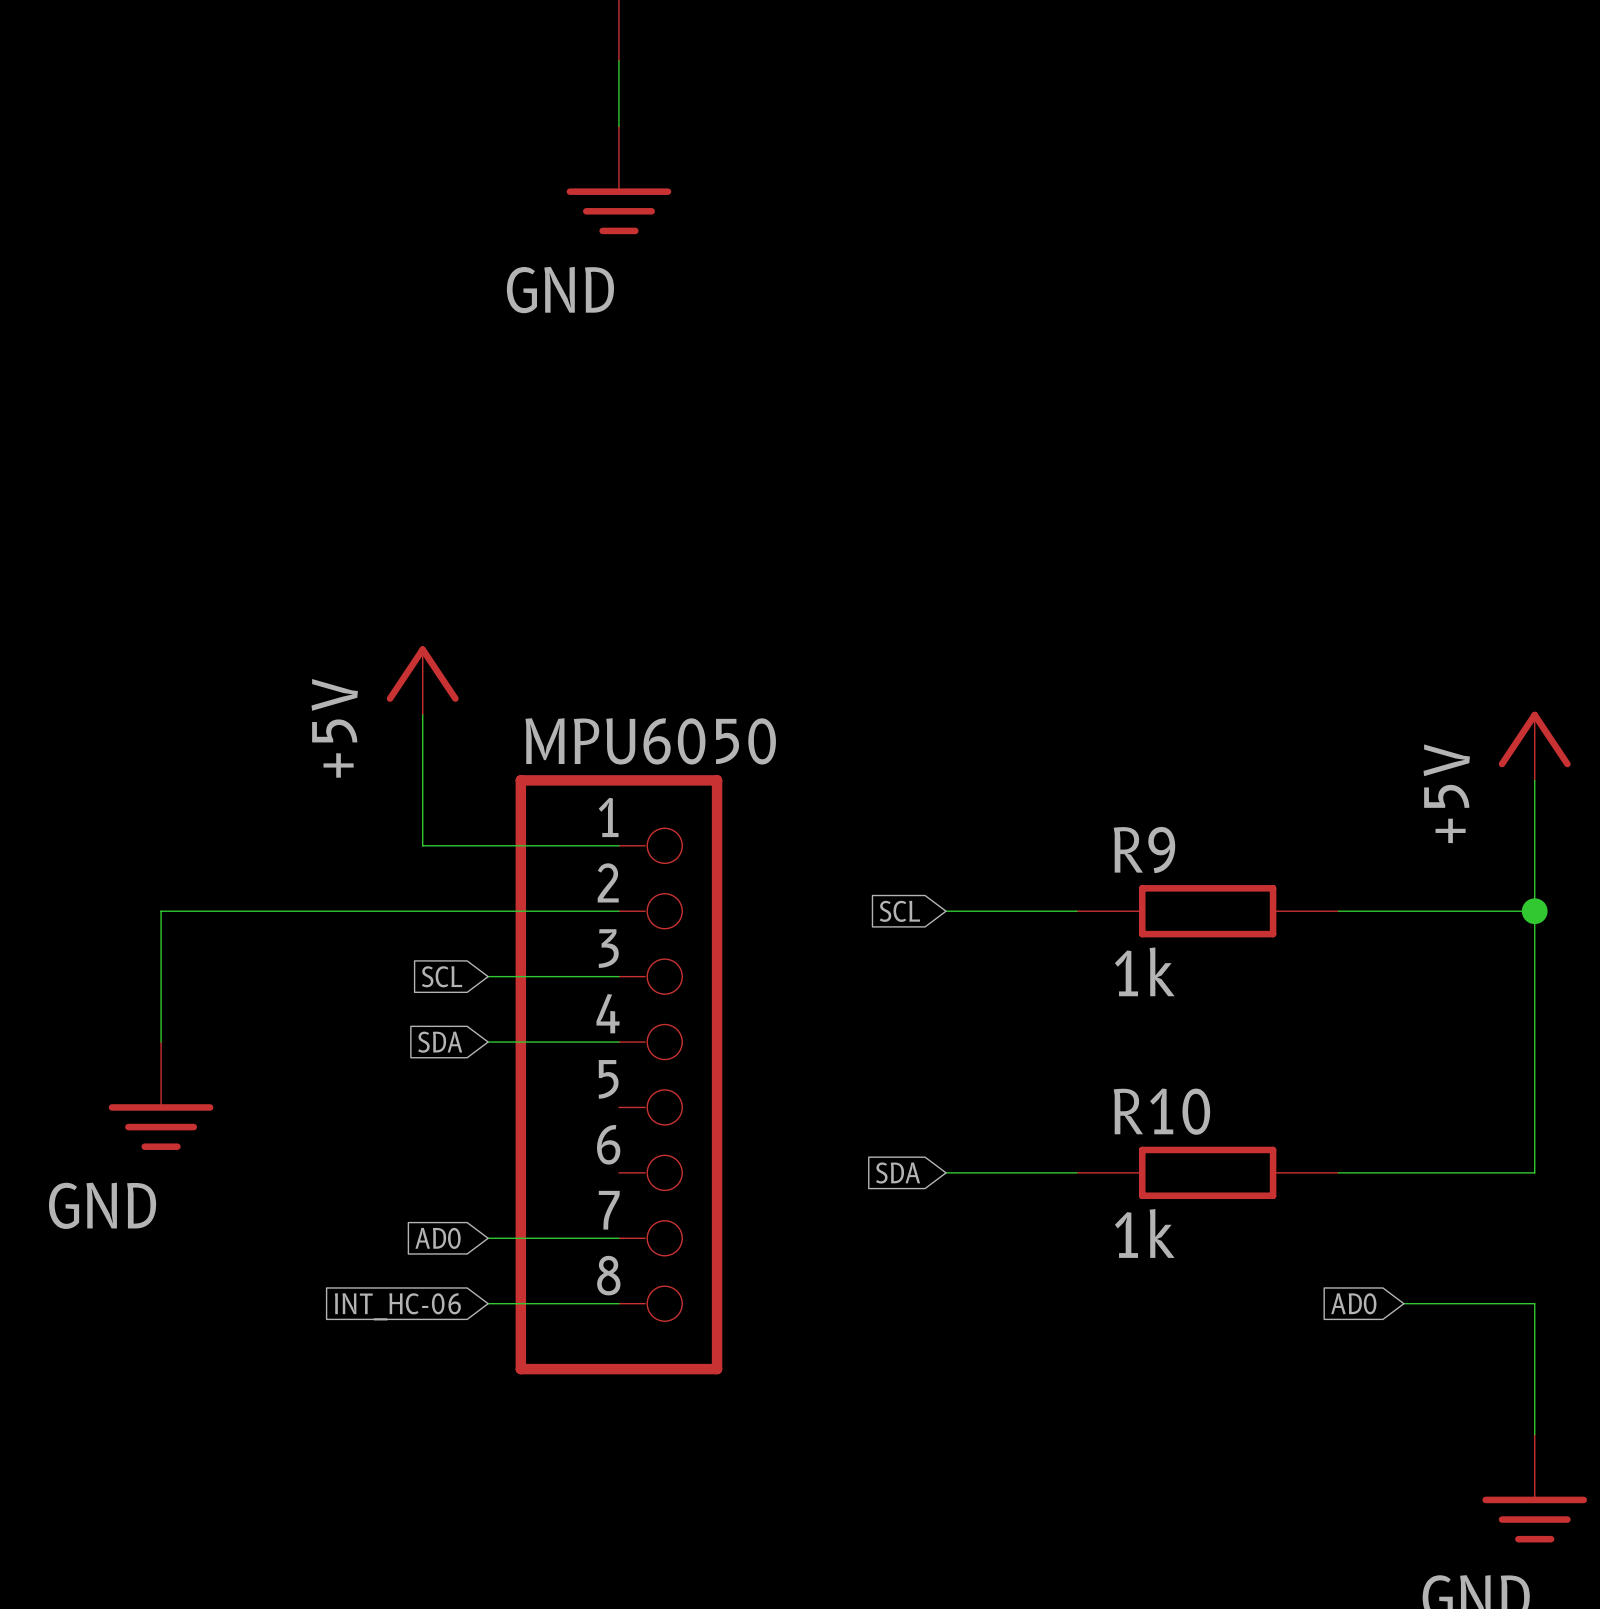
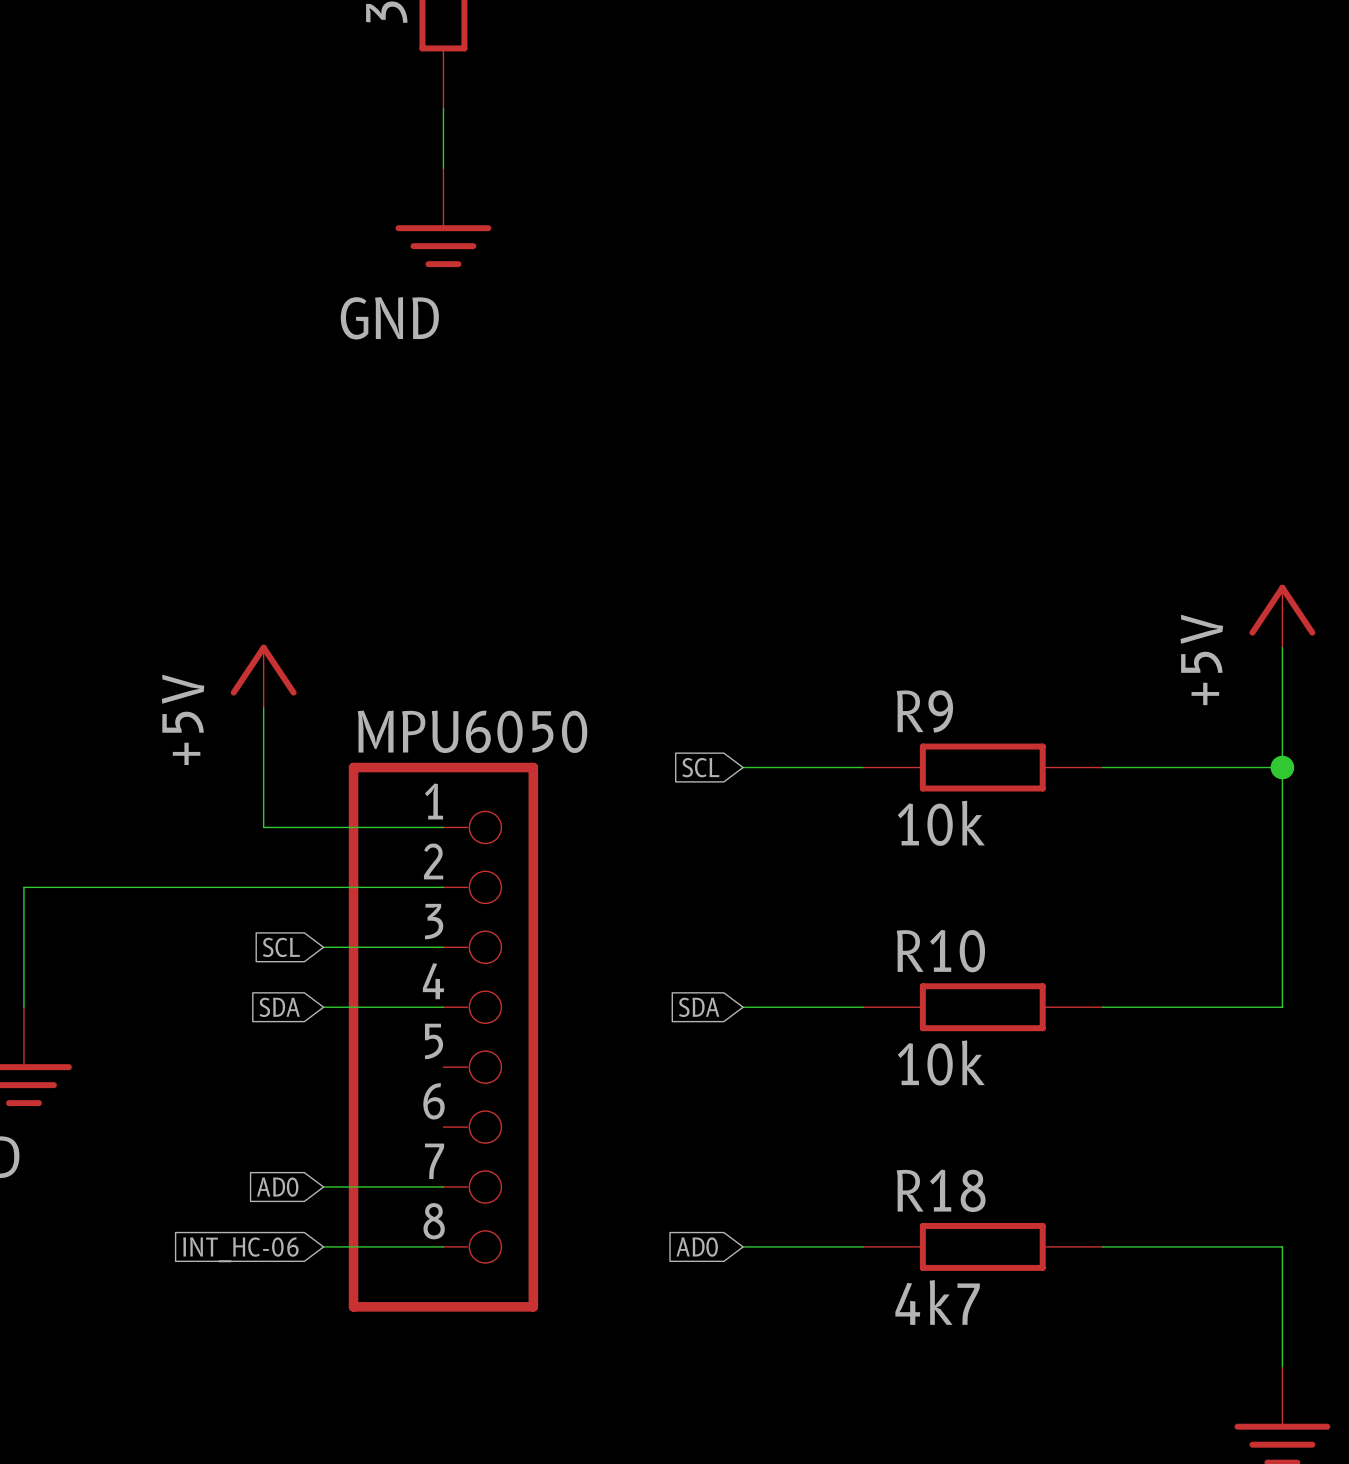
wire: none -> (1282, 647) (1282, 767) (1102, 767)
power symbol position: +5V (1534, 746) -> +5V (1282, 616)
wire: none -> (743, 767) (862, 767)
global label position: SCL (899, 911) -> SCL (700, 767)
wire: (946, 911) (1076, 911) -> (743, 1007) (862, 1007)
R9 position: (1207, 911) -> (982, 767)
wire: (1338, 911) (1534, 911) -> none
junction position: (1534, 911) -> (1282, 767)
R9 value: 1k (1144, 971) -> 10k (941, 823)
wire: (1534, 1042) (1534, 1172) (1338, 1172) -> (1282, 1007) (1102, 1007)
global label position: SDA (898, 1172) -> SDA (699, 1007)
wire: (946, 1172) (1076, 1172) -> (743, 1246) (862, 1246)
R10 position: (1207, 1172) -> (982, 1007)
R10 value: 1k (1144, 1233) -> 10k (941, 1063)
R18: none -> 4k7 (982, 1246)
wire: none -> (1102, 1246) (1162, 1246)
global label position: AD0 (1353, 1303) -> AD0 (697, 1247)

